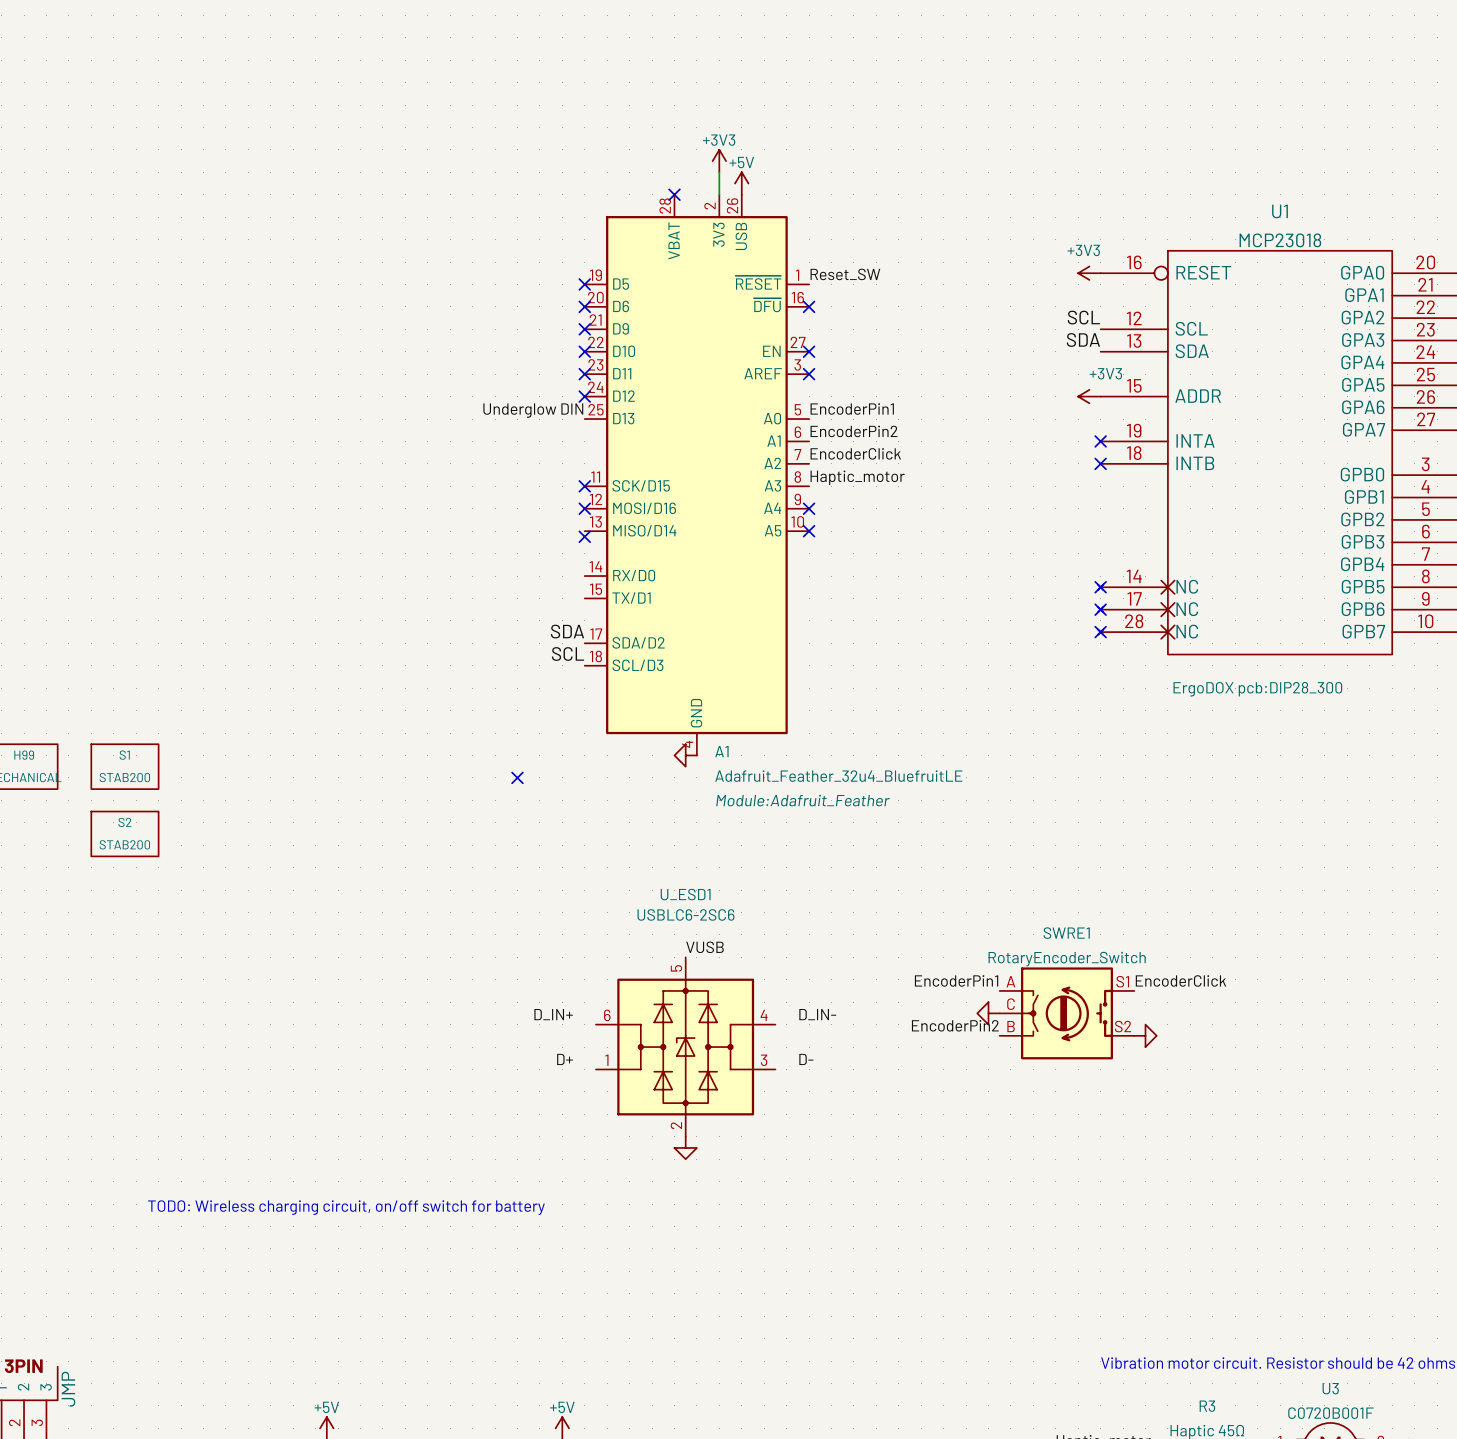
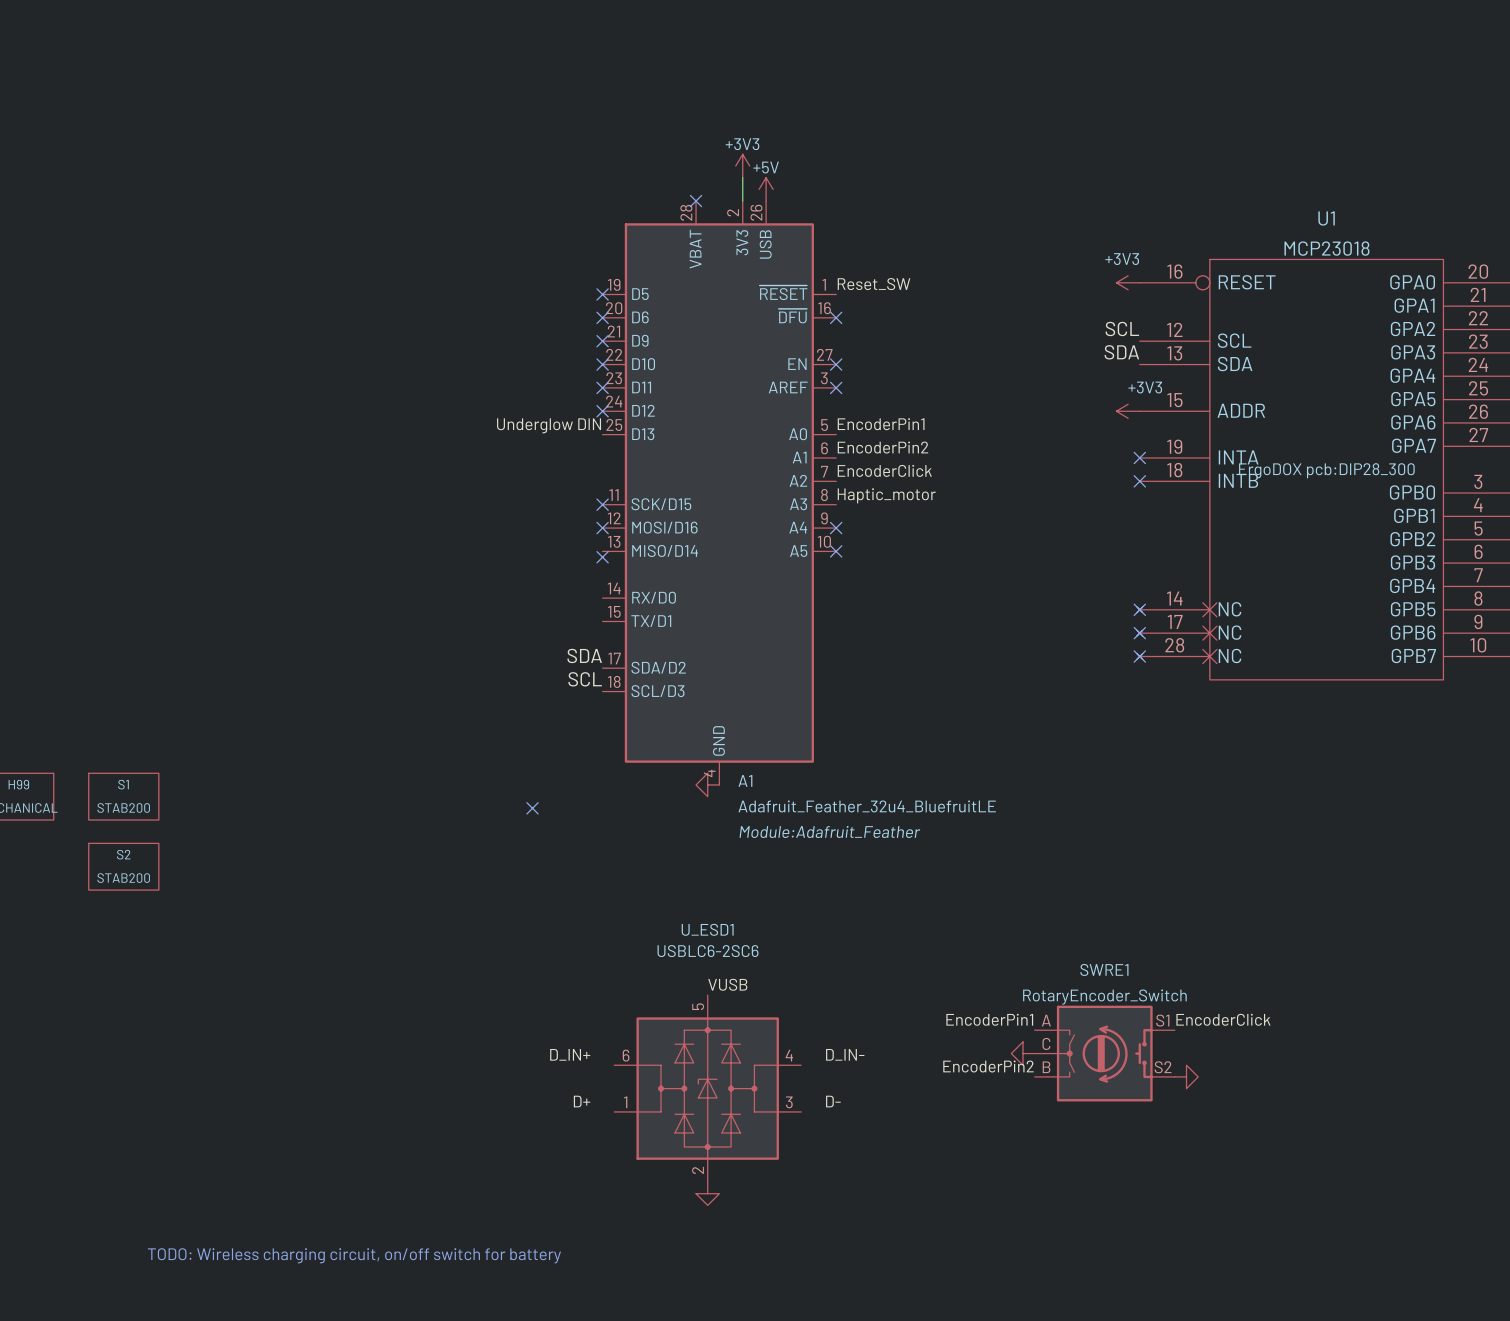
U1 text position: ErgoDOX pcb:DIP28_300 (1257, 689) -> ErgoDOX pcb:DIP28_300 (1326, 470)

